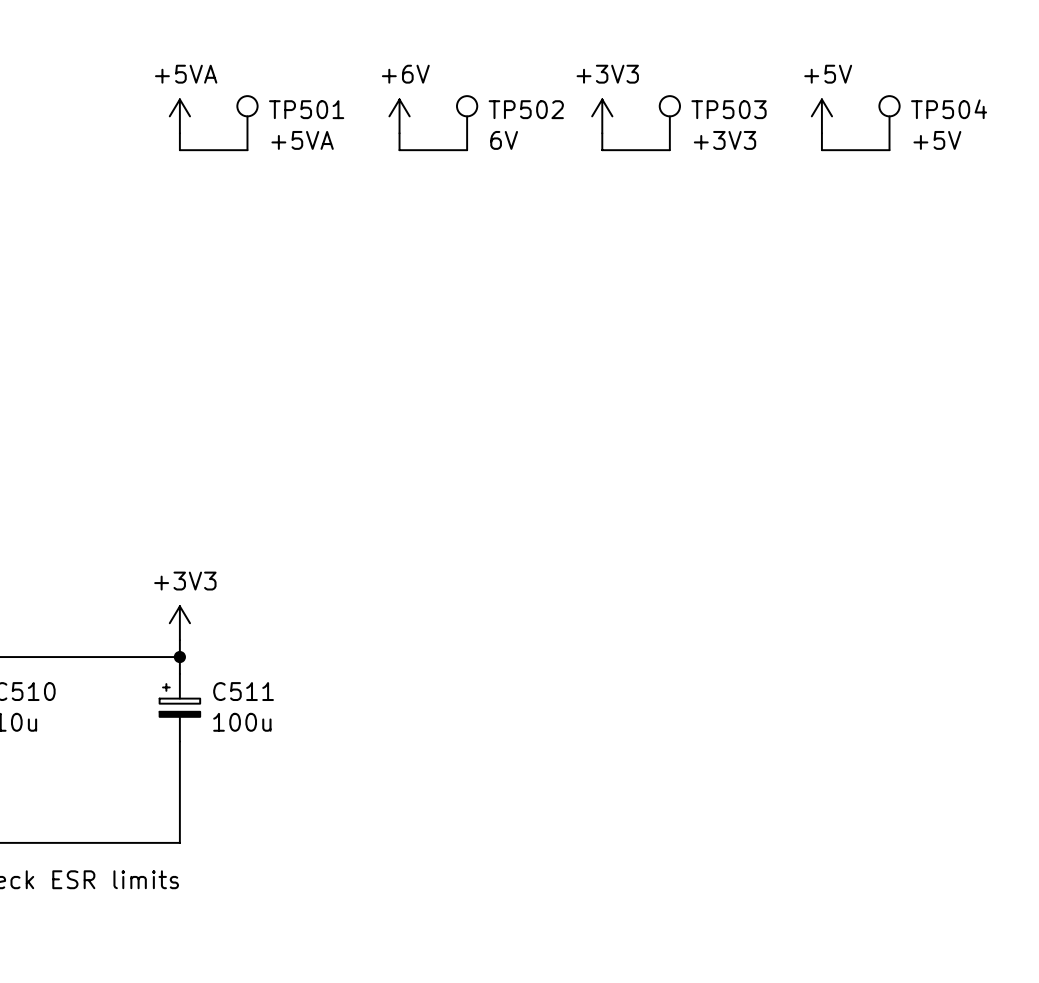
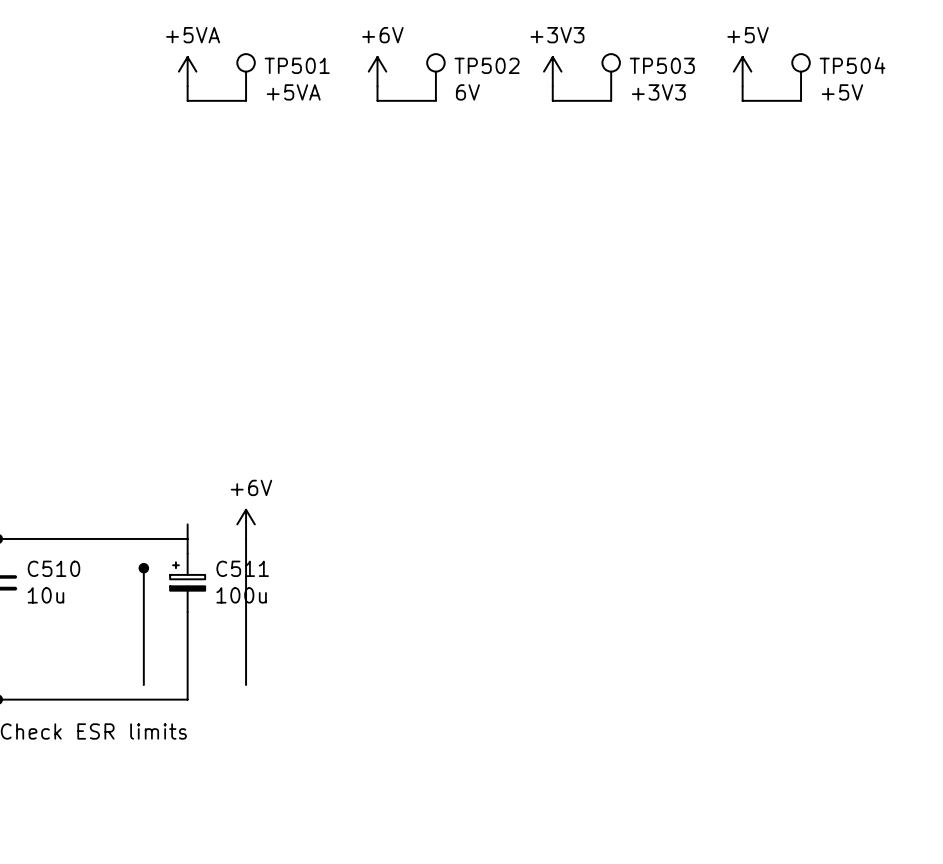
power symbol: +3V3 (179, 623) -> none
power symbol: none -> +6V (246, 524)
junction position: (179, 657) -> (143, 568)
wire: none -> (246, 538) (246, 685)
wire: none -> (143, 568) (143, 685)

